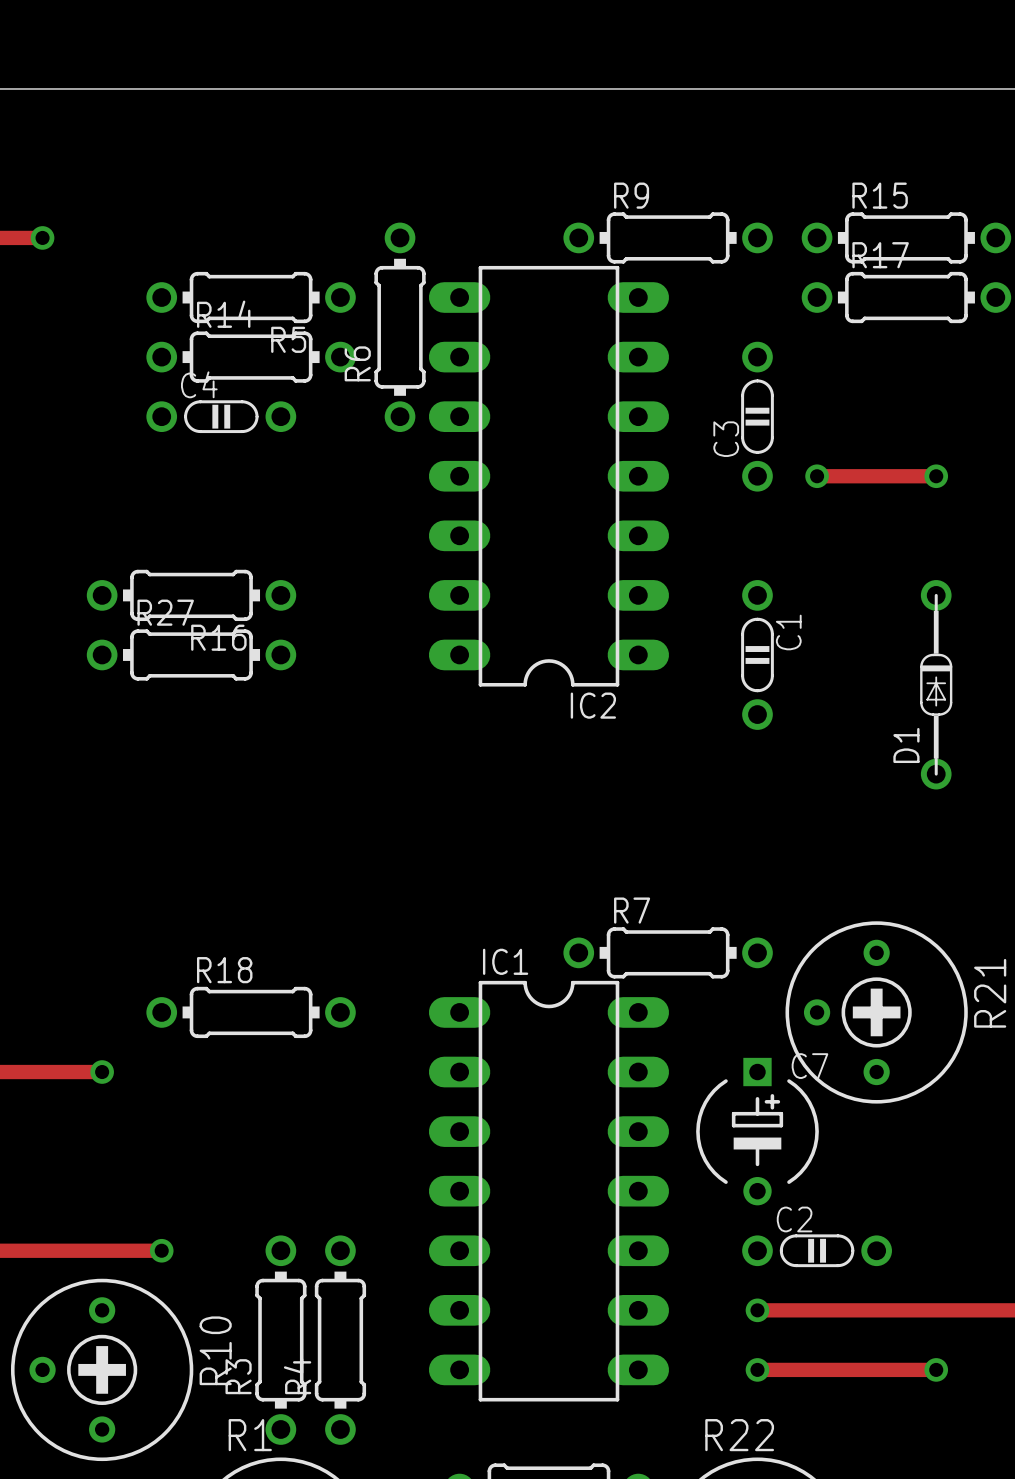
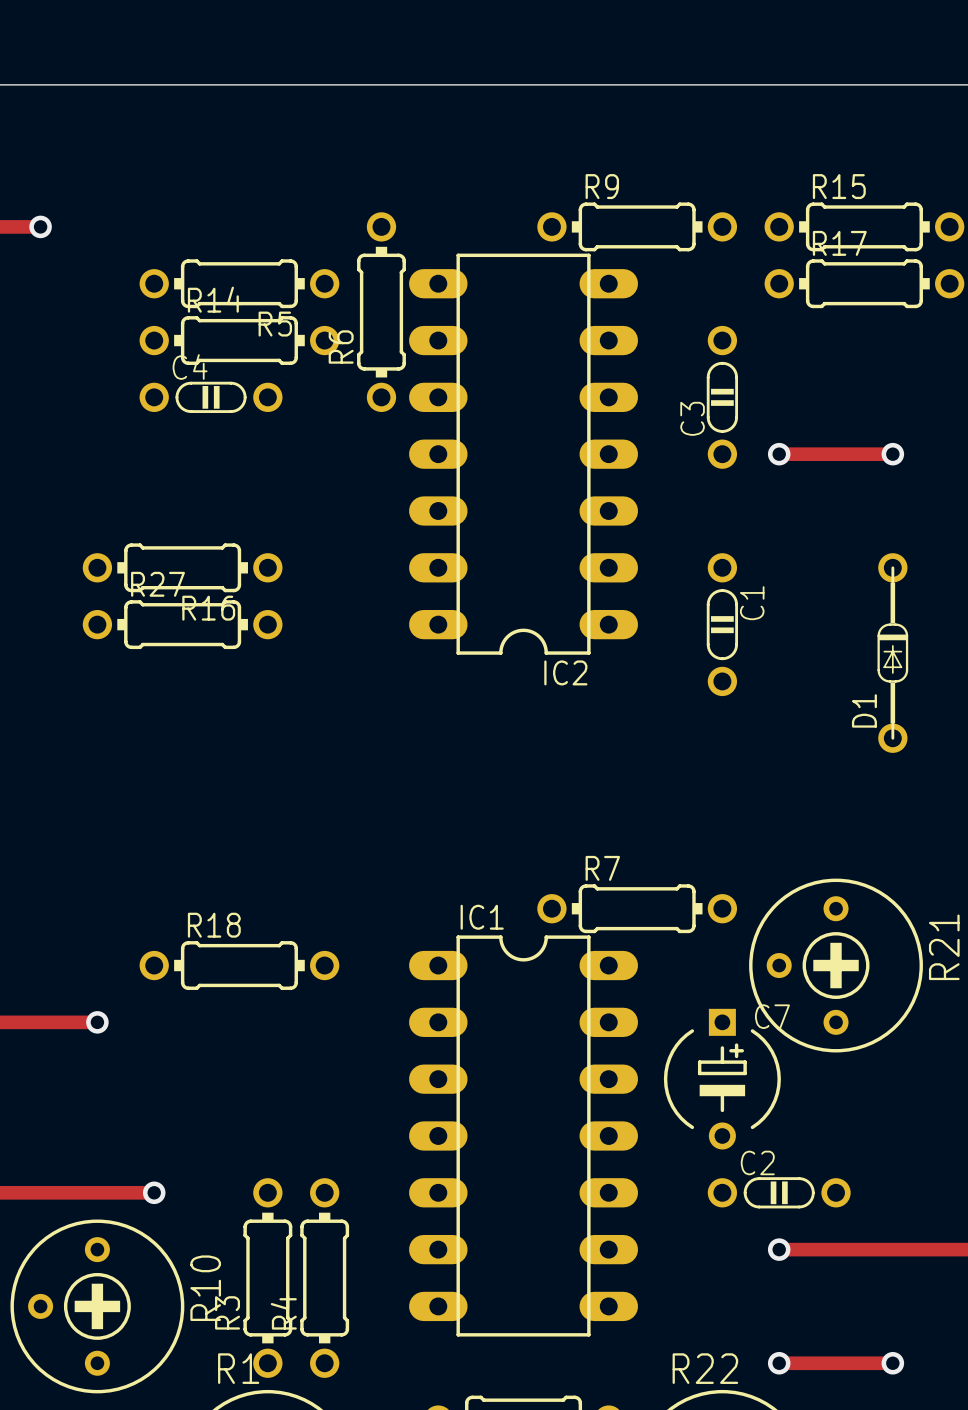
track: (757, 1310) (817, 1310) -> none
via: (757, 1310) -> none
via: none -> (779, 1249)
track: (757, 1369) (936, 1369) -> none
via: (757, 1369) -> none
via position: (936, 1369) -> (892, 1363)
track: none -> (779, 1363) (892, 1363)
via: none -> (779, 1363)

